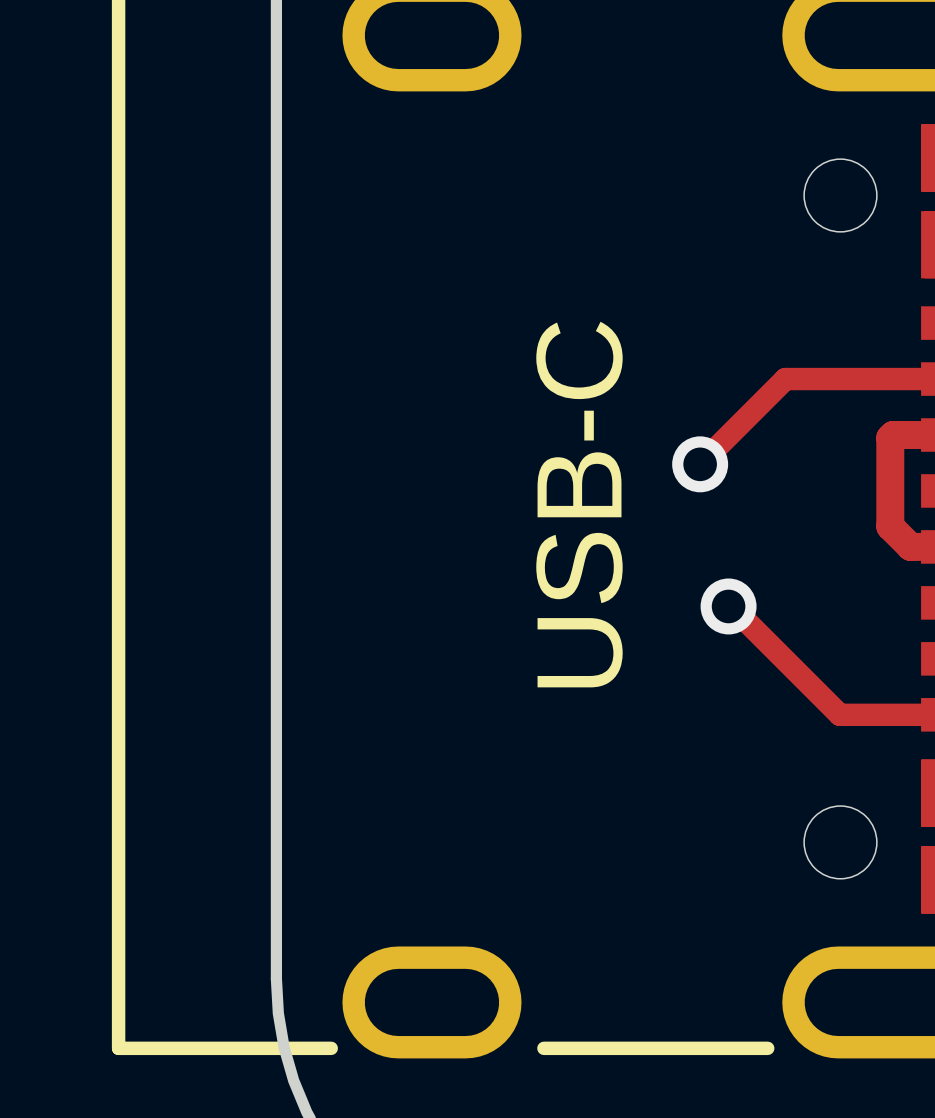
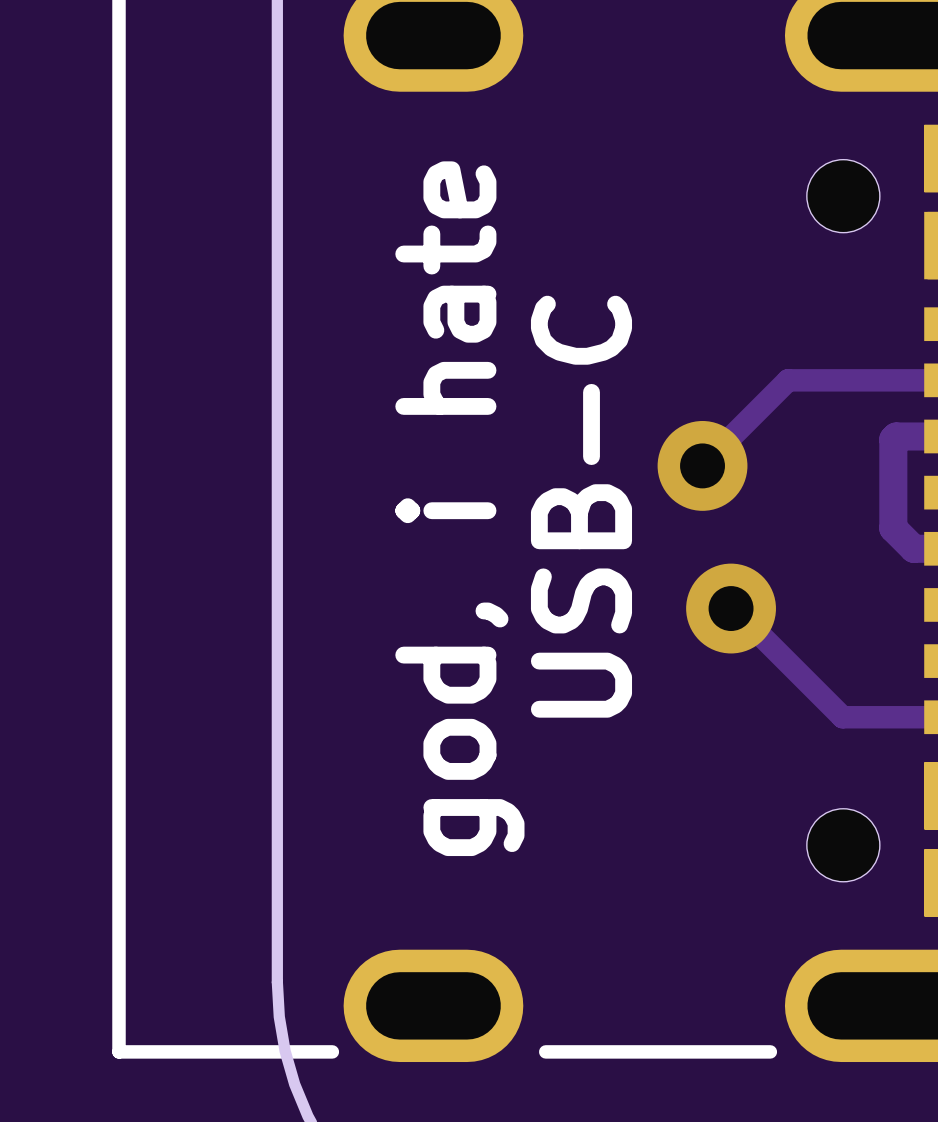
via size: [672, 436, 729, 493] -> [657, 420, 748, 511]
text: none -> god, i hate (459, 508)
via size: [700, 578, 757, 635] -> [686, 563, 776, 654]

